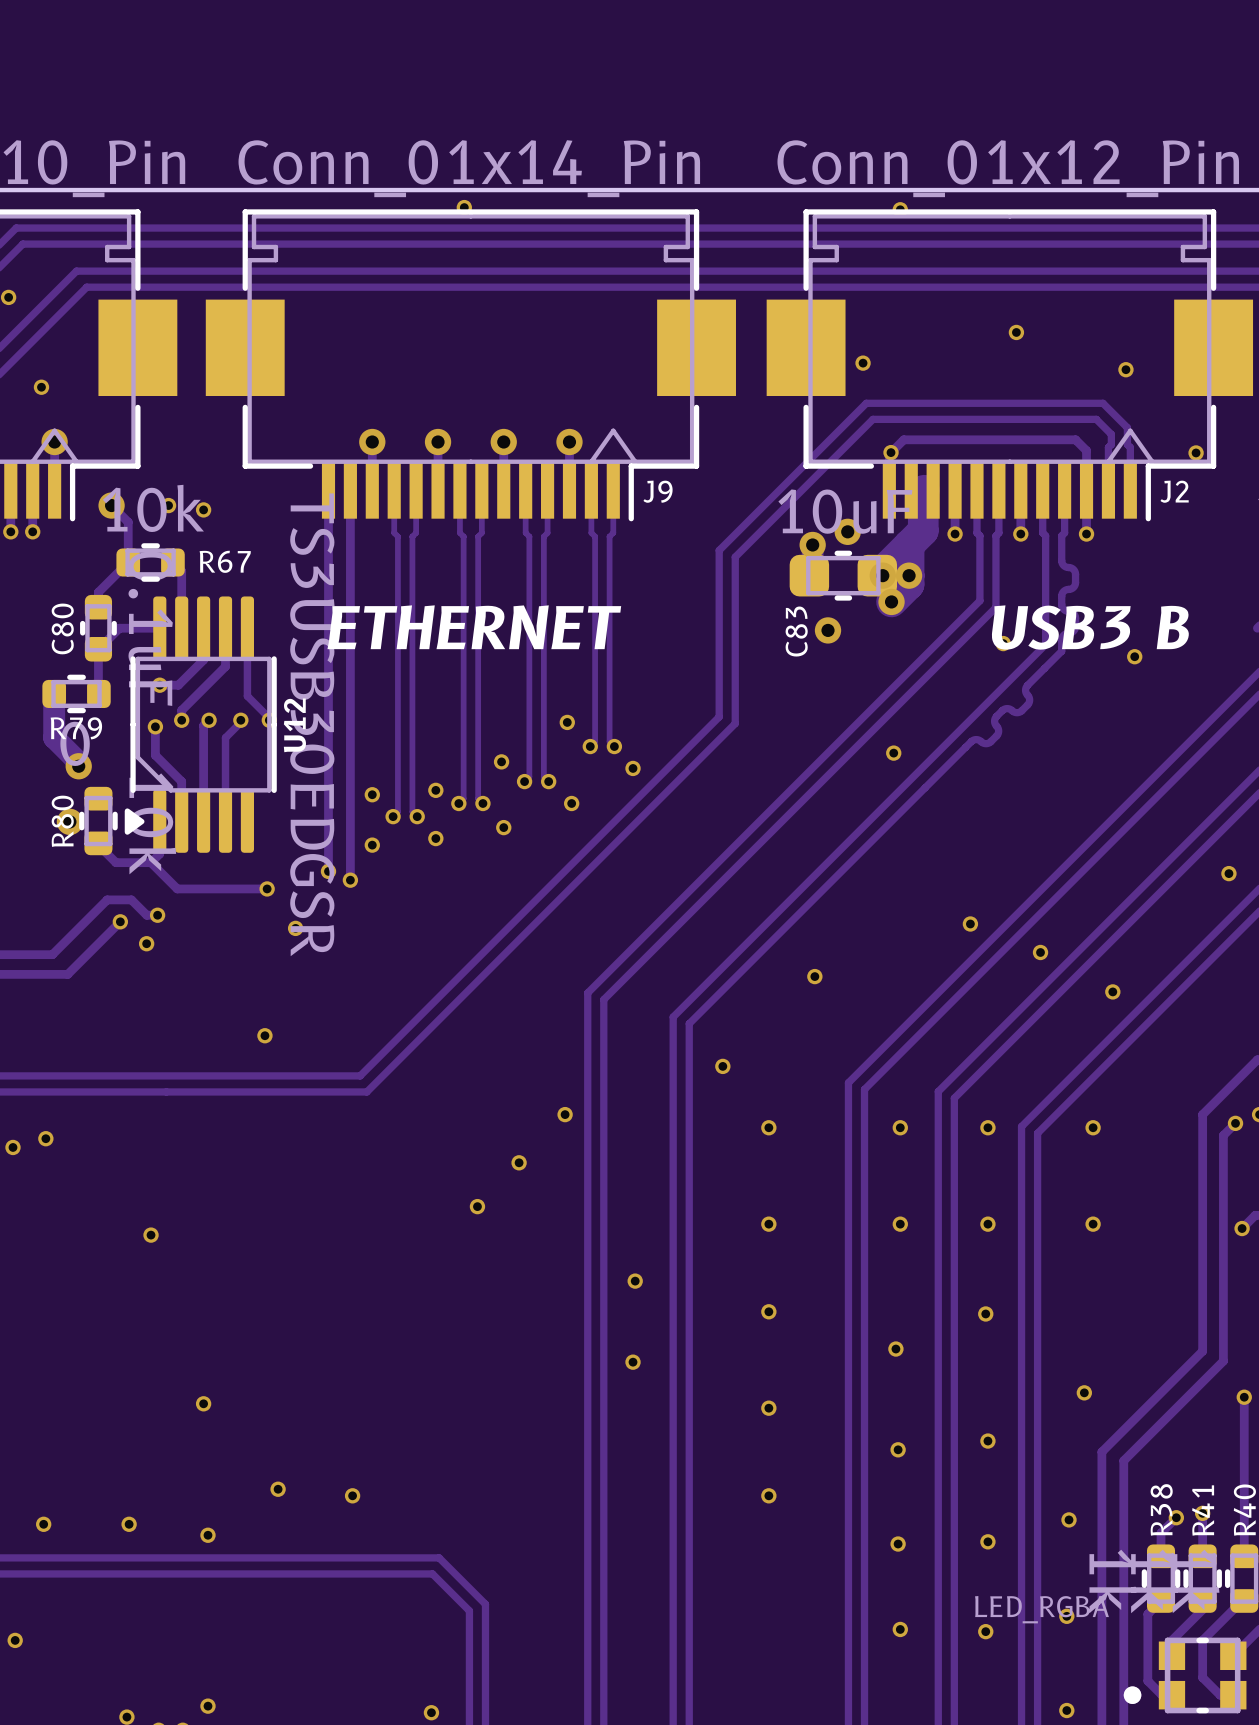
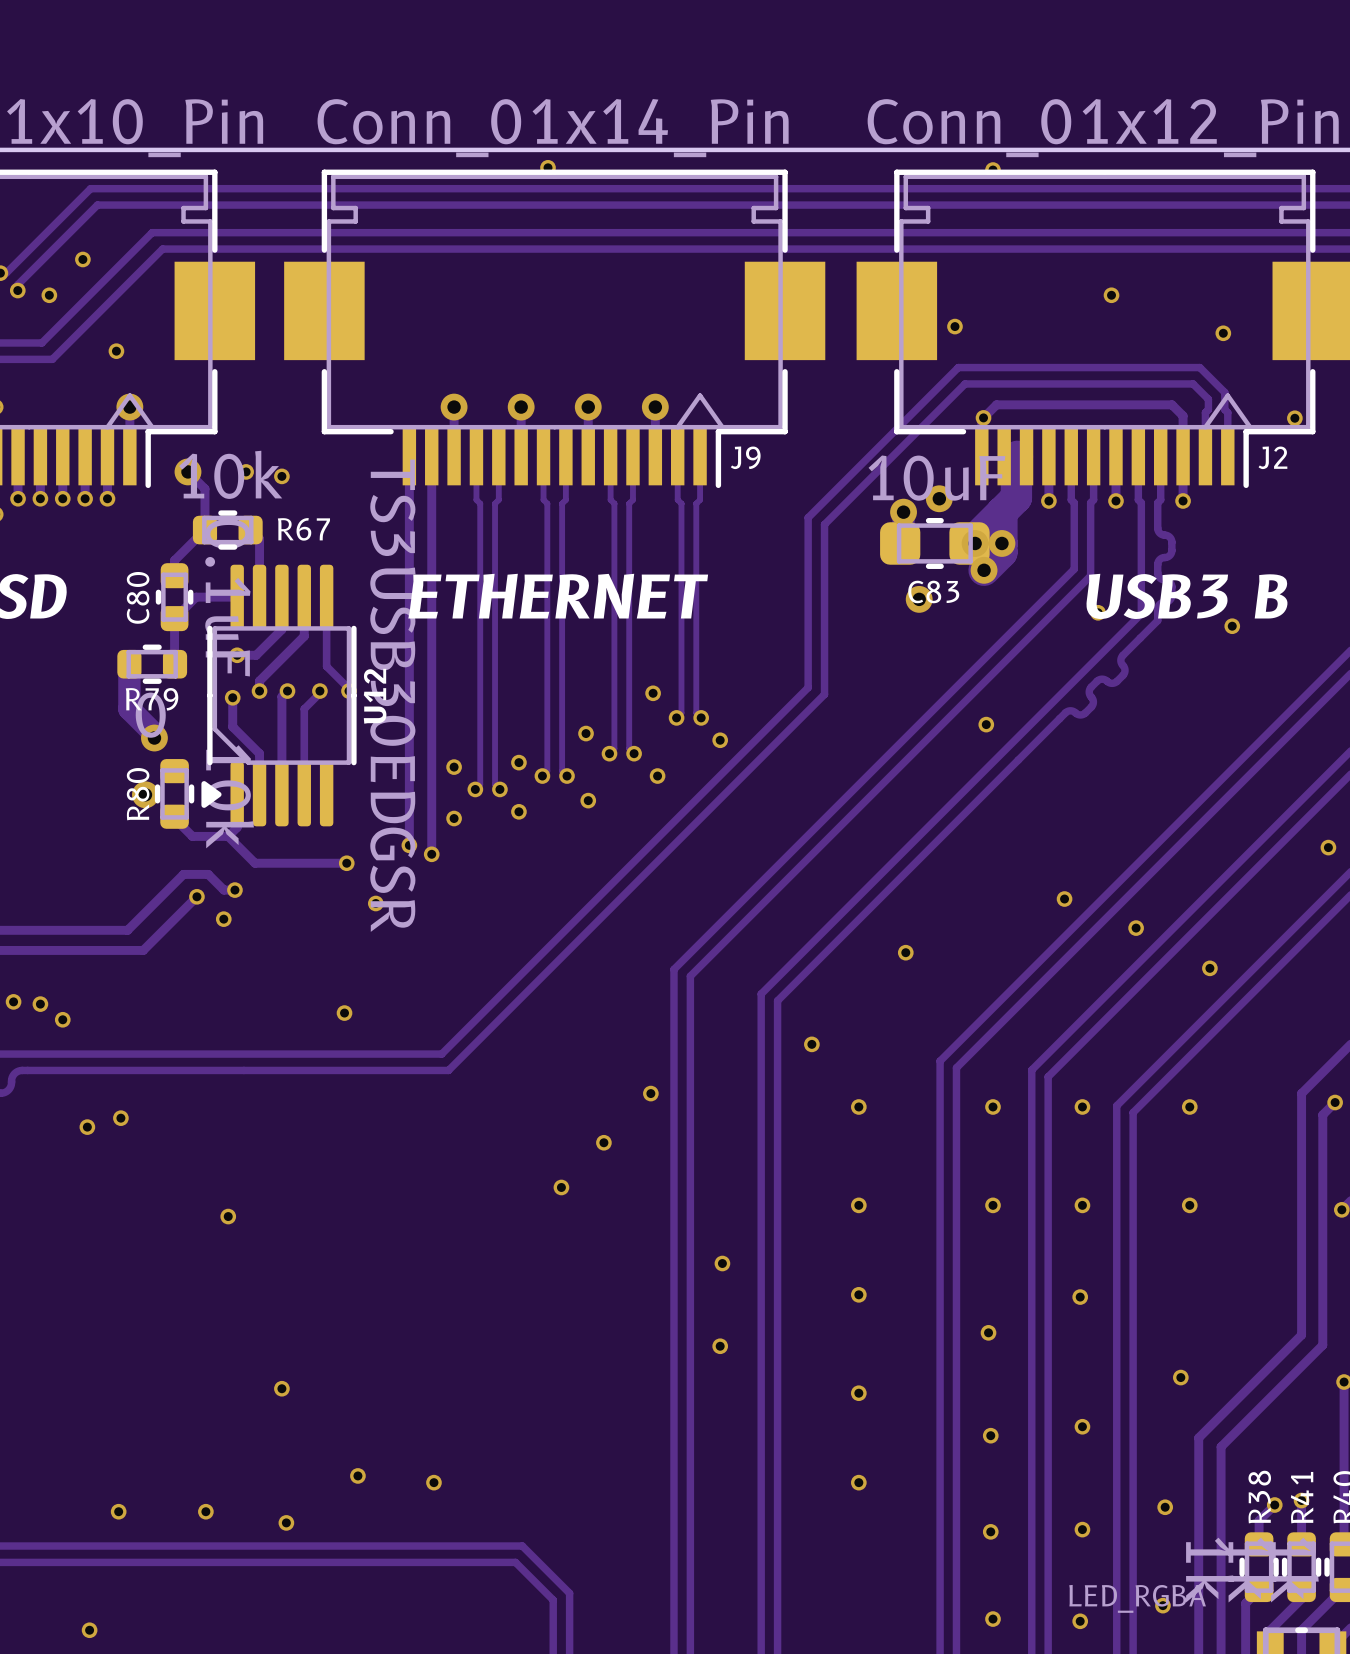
C83 name rotation: 0° (796, 631) -> 90° clockwise (933, 591)

